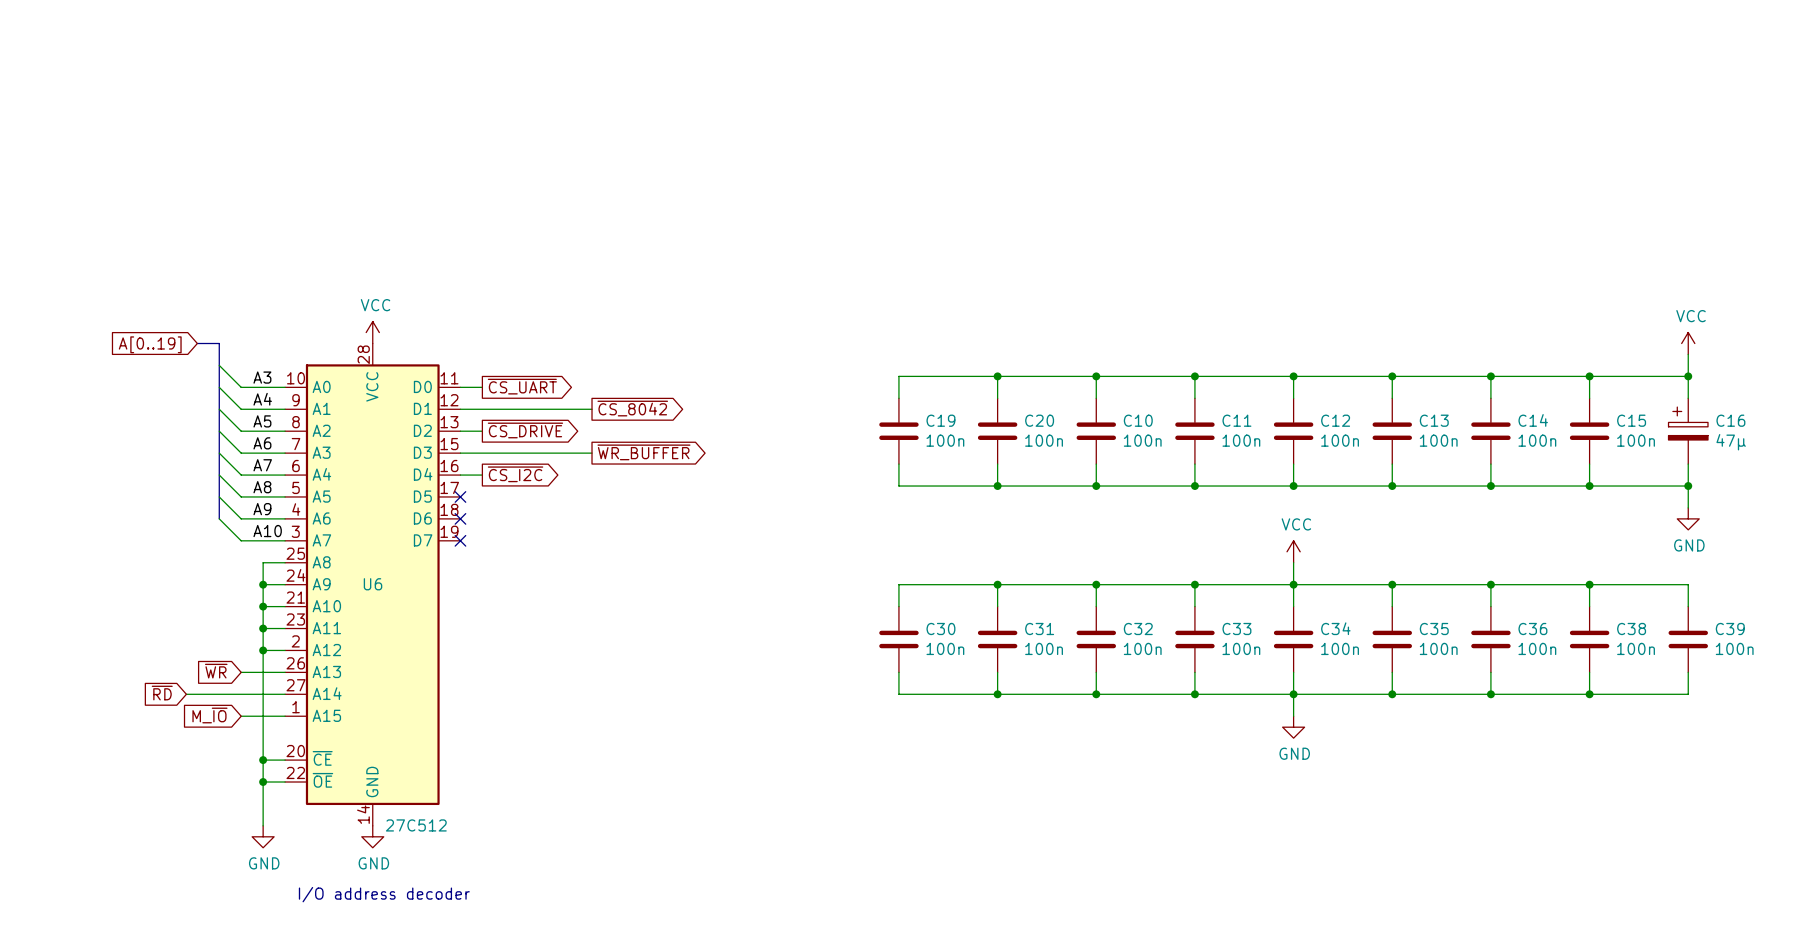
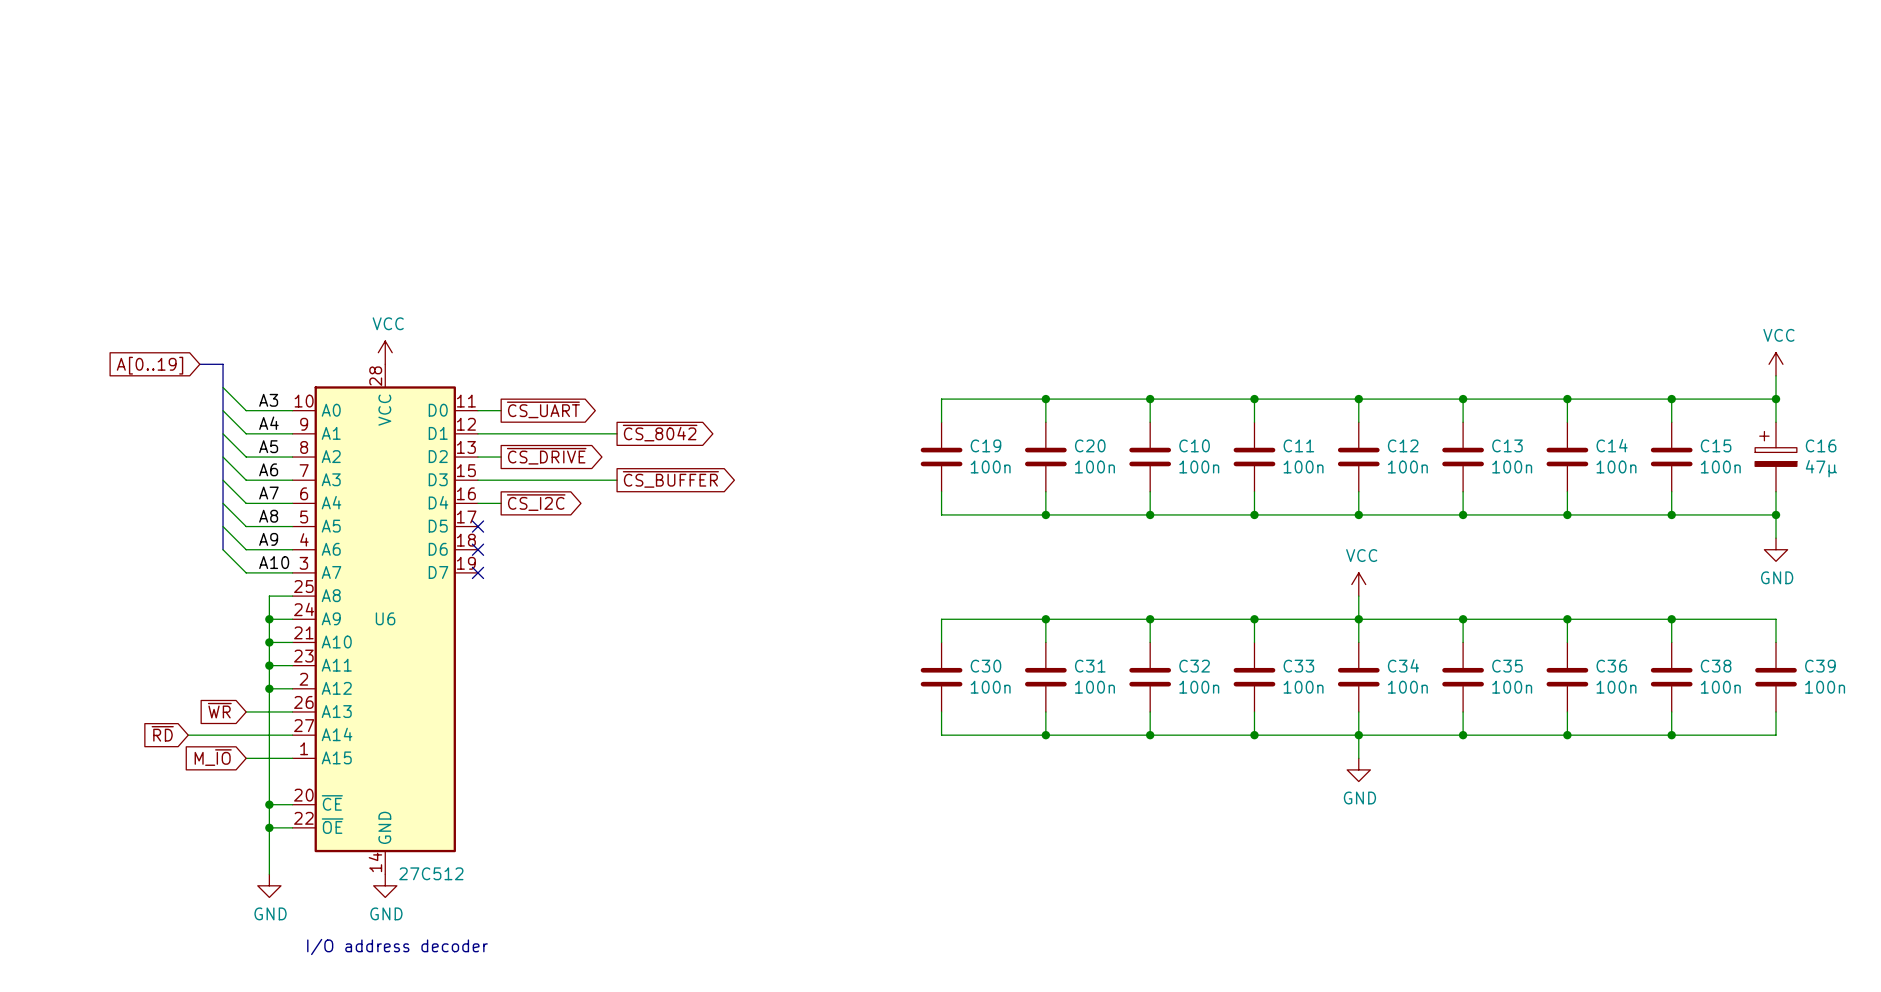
global label: ~{WR_BUFFER} (643, 452) -> ~{CS_BUFFER} (670, 479)

